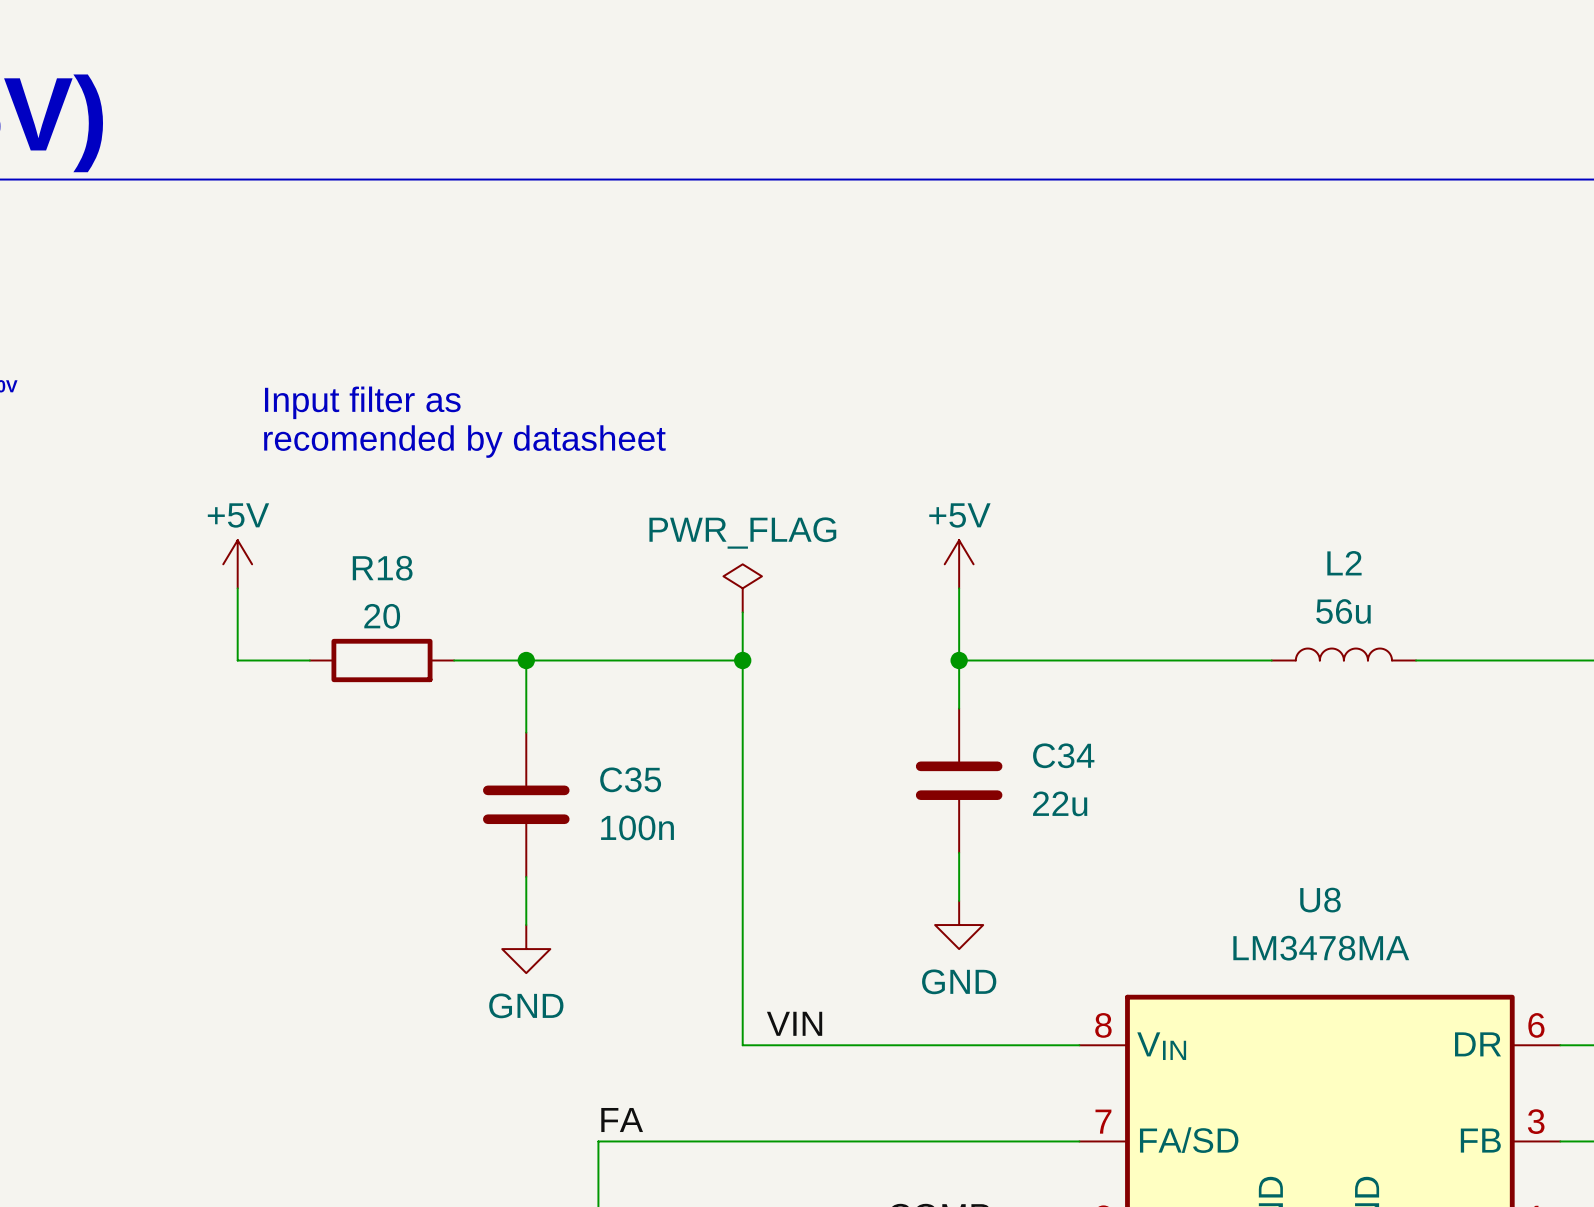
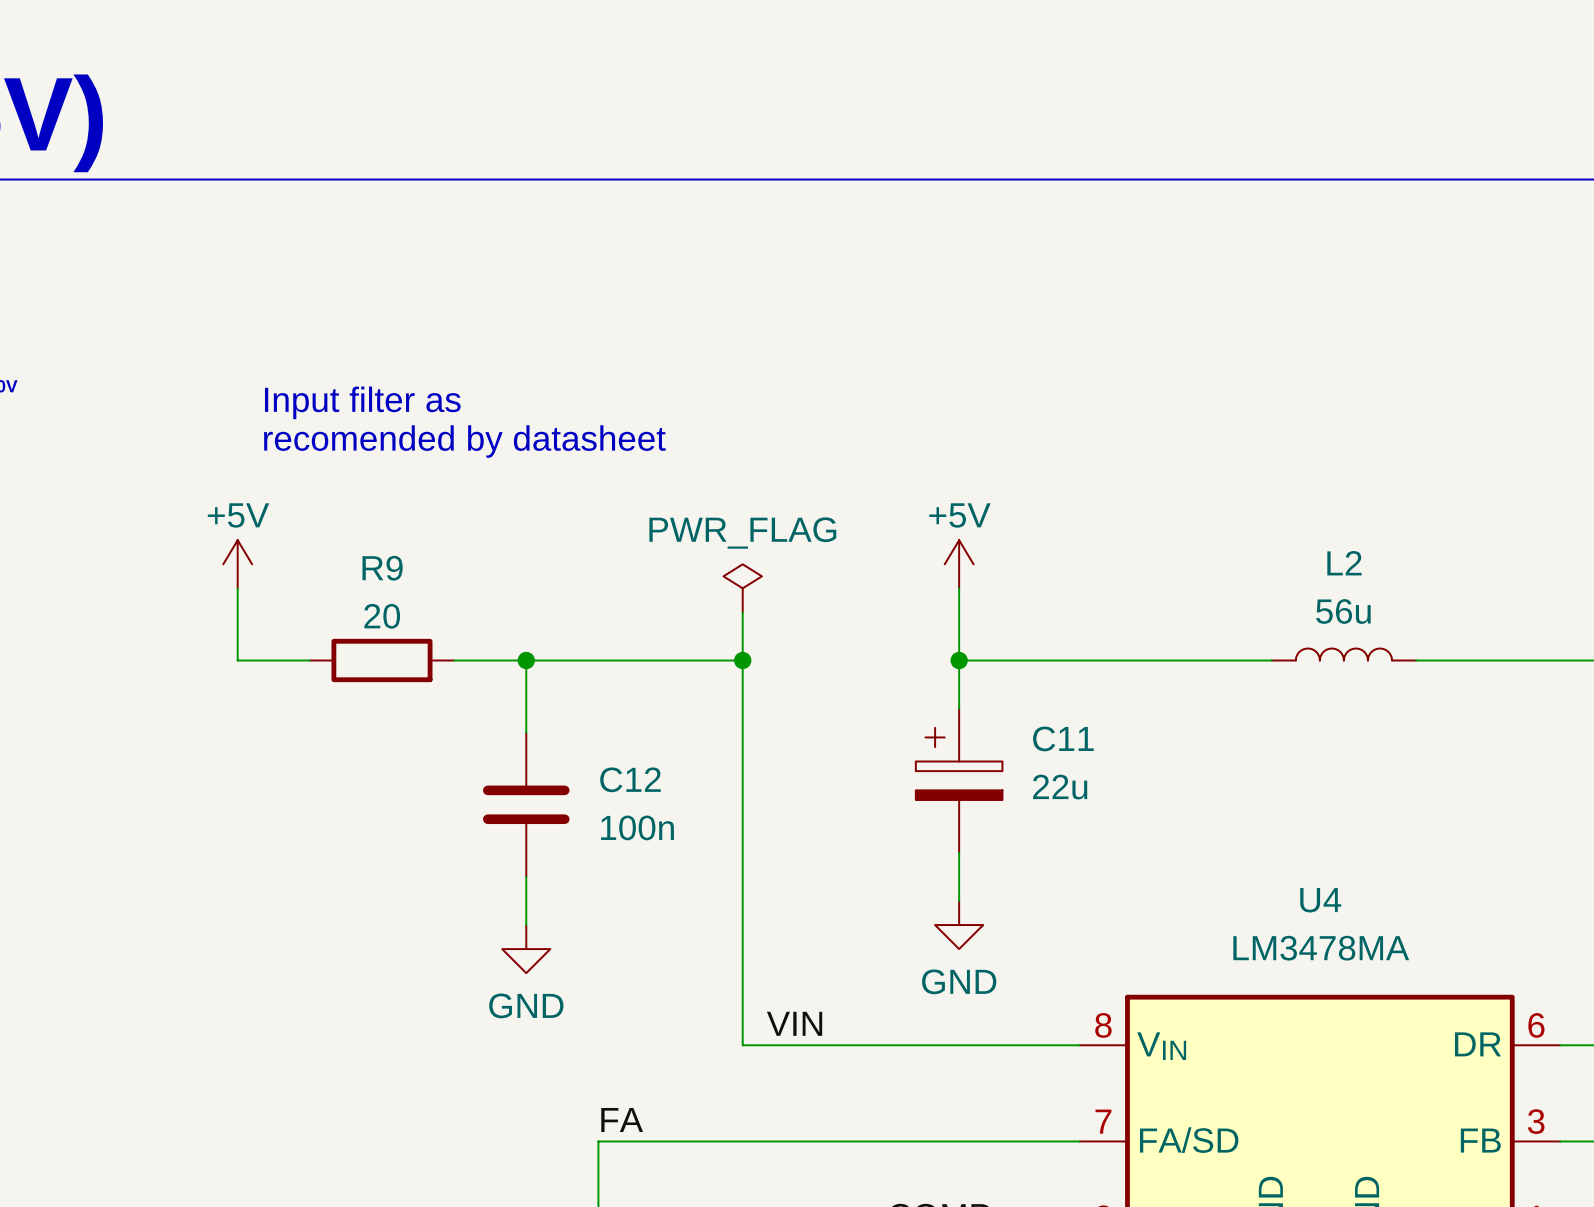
R18 name: R18 (382, 568) -> R9 (382, 568)
C35 name: C35 (630, 779) -> C12 (630, 779)
C34: 22u (959, 780) -> none
C11: none -> 22u (959, 780)
U8 name: U8 (1320, 900) -> U4 (1320, 900)

